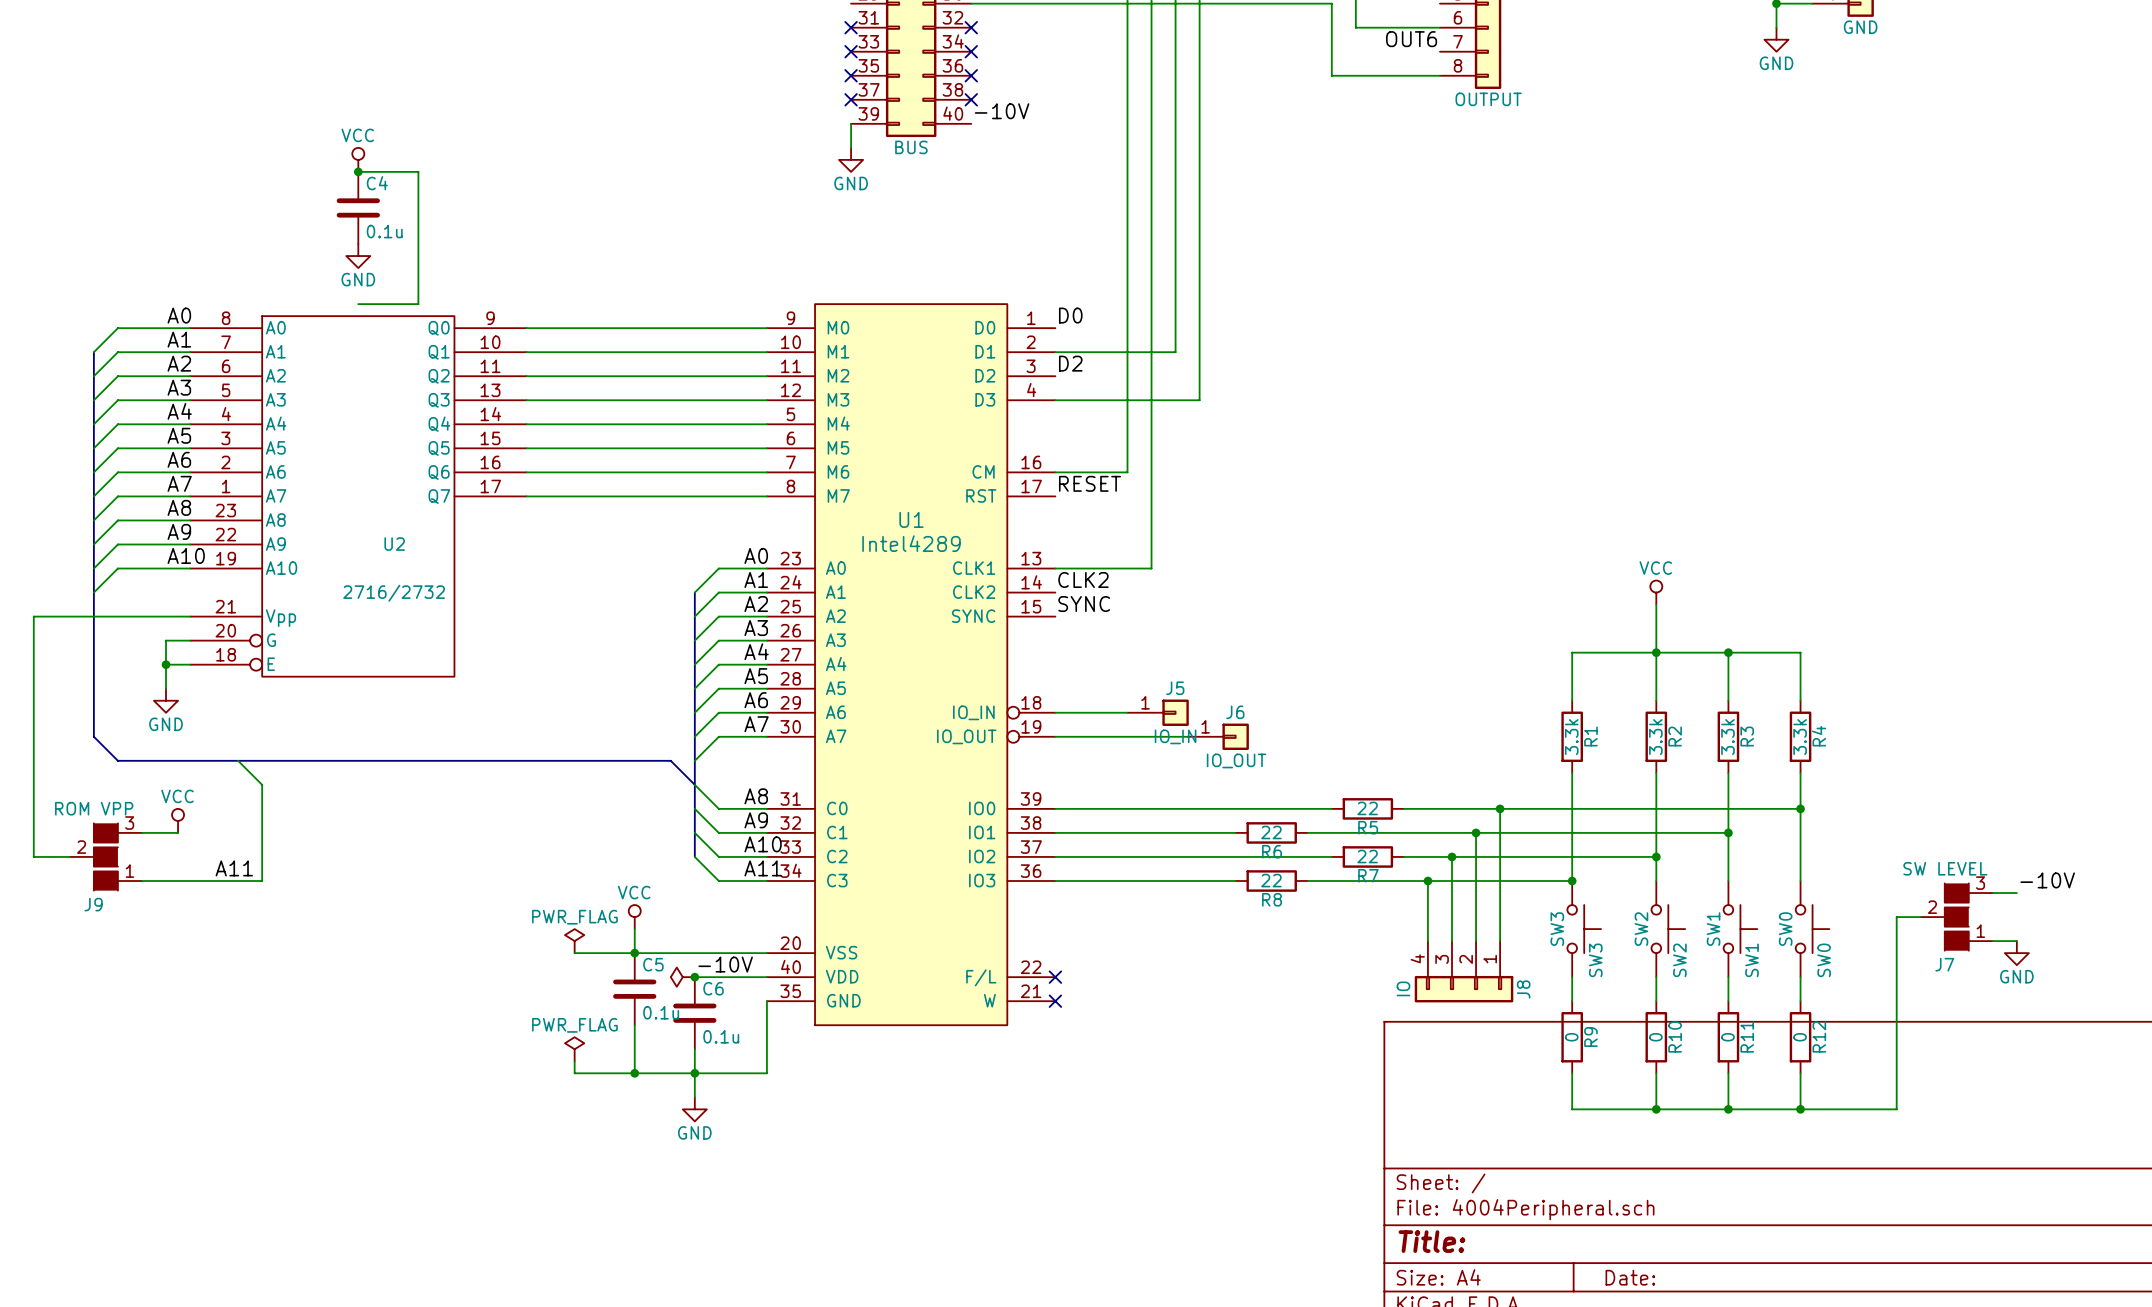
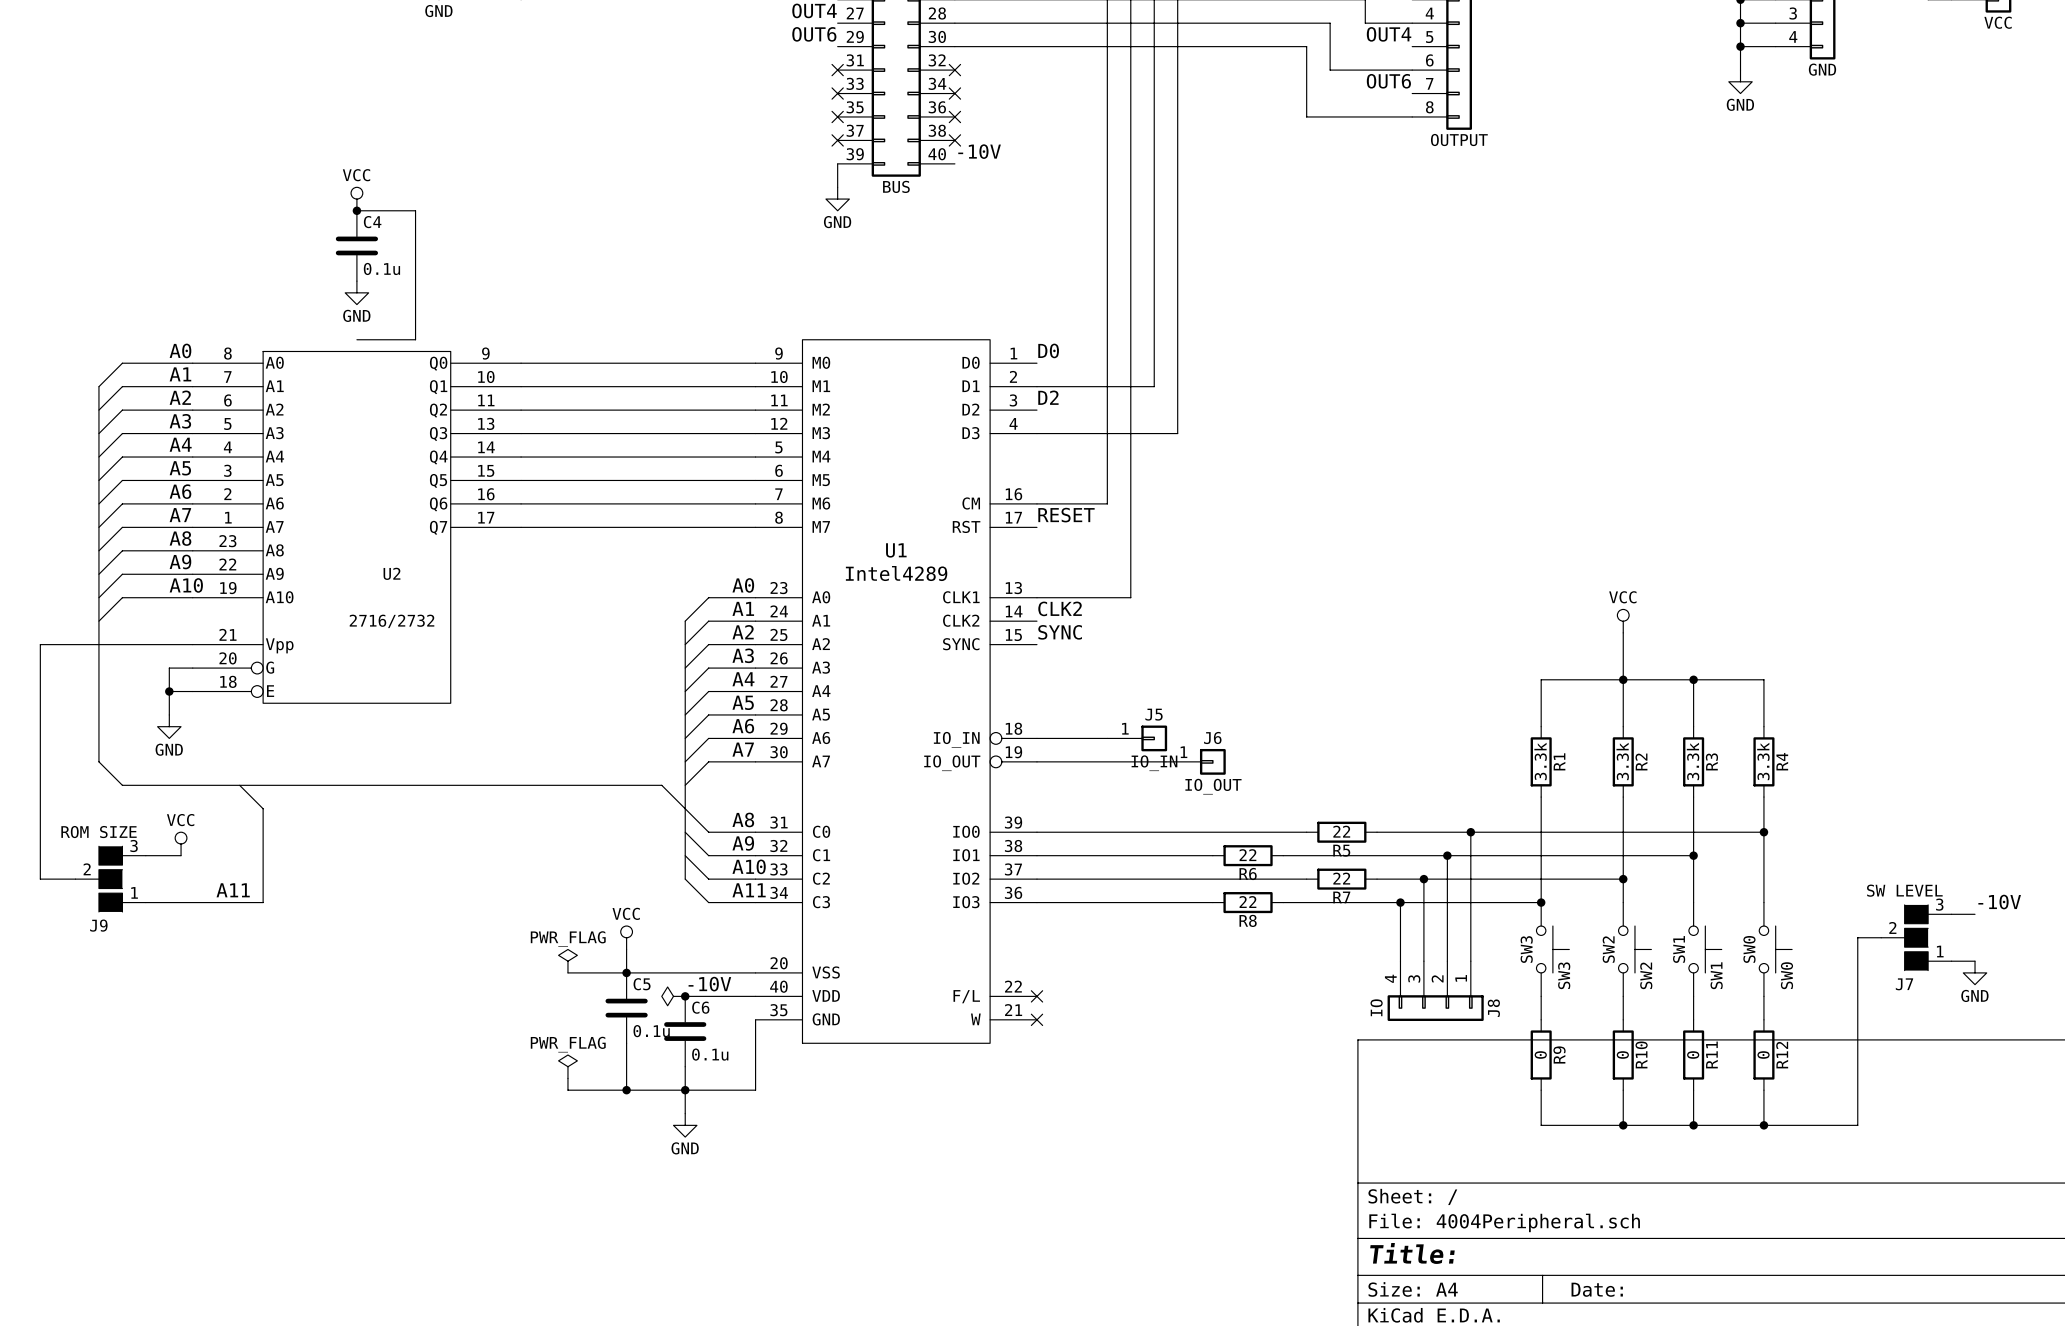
J9 value: ROM VPP (94, 808) -> ROM SIZE (99, 832)

